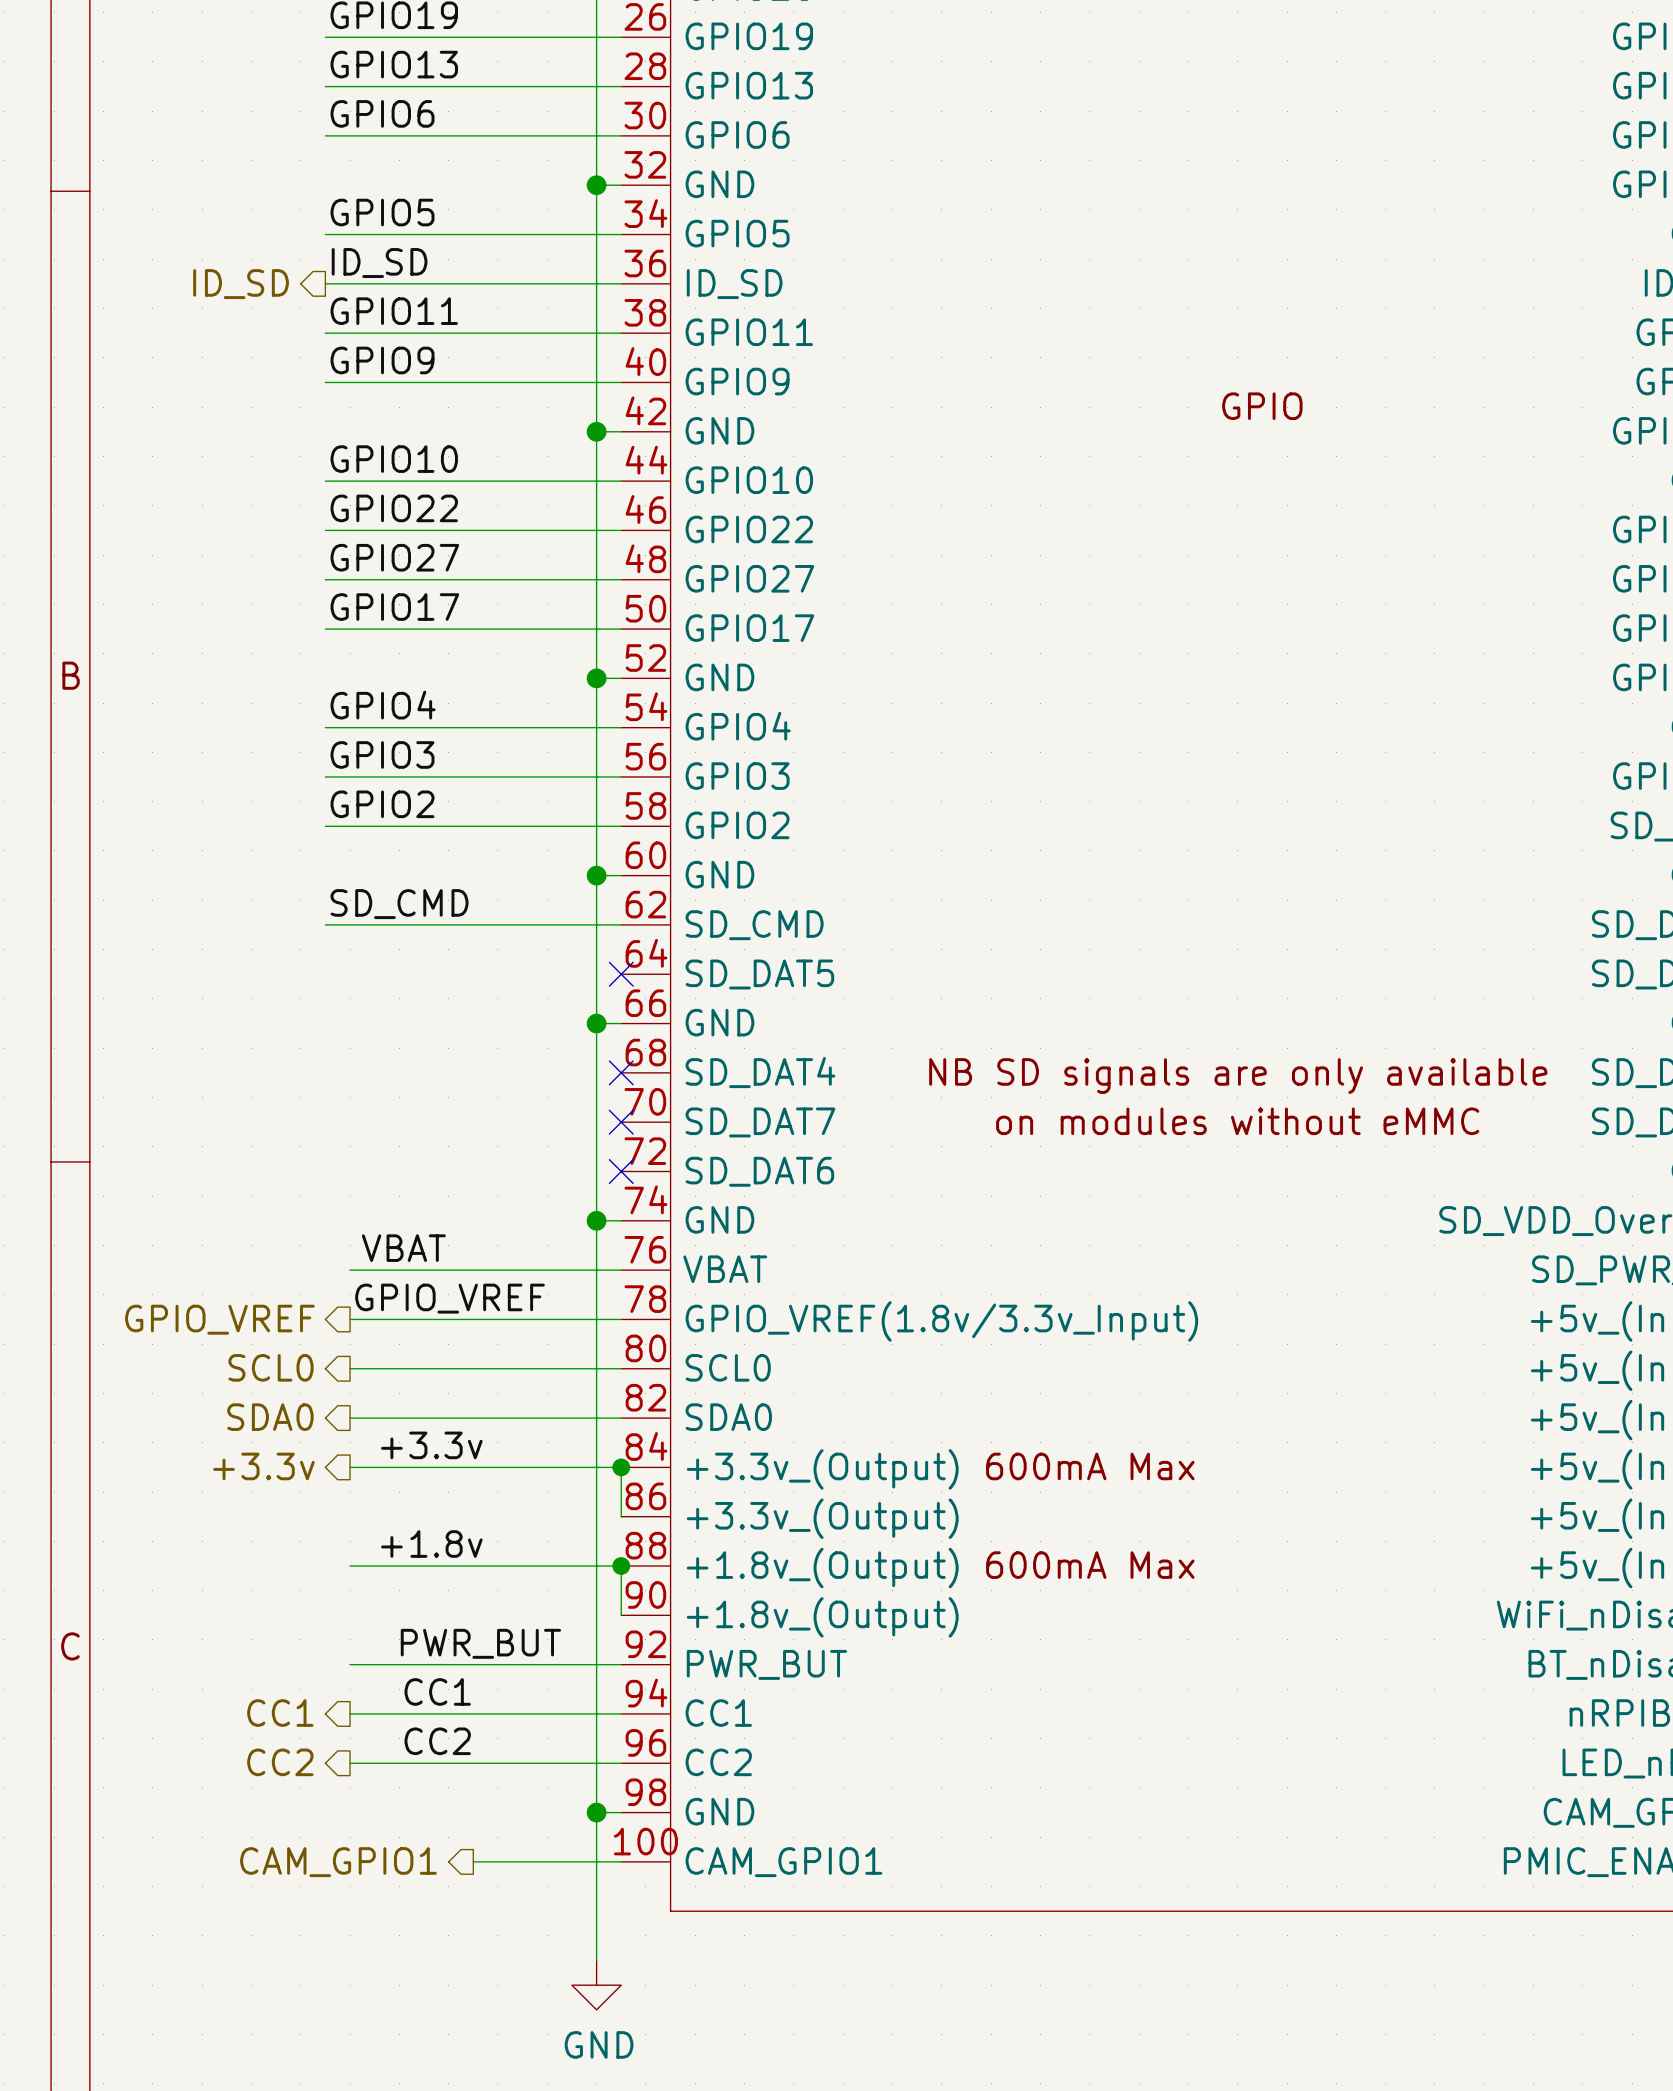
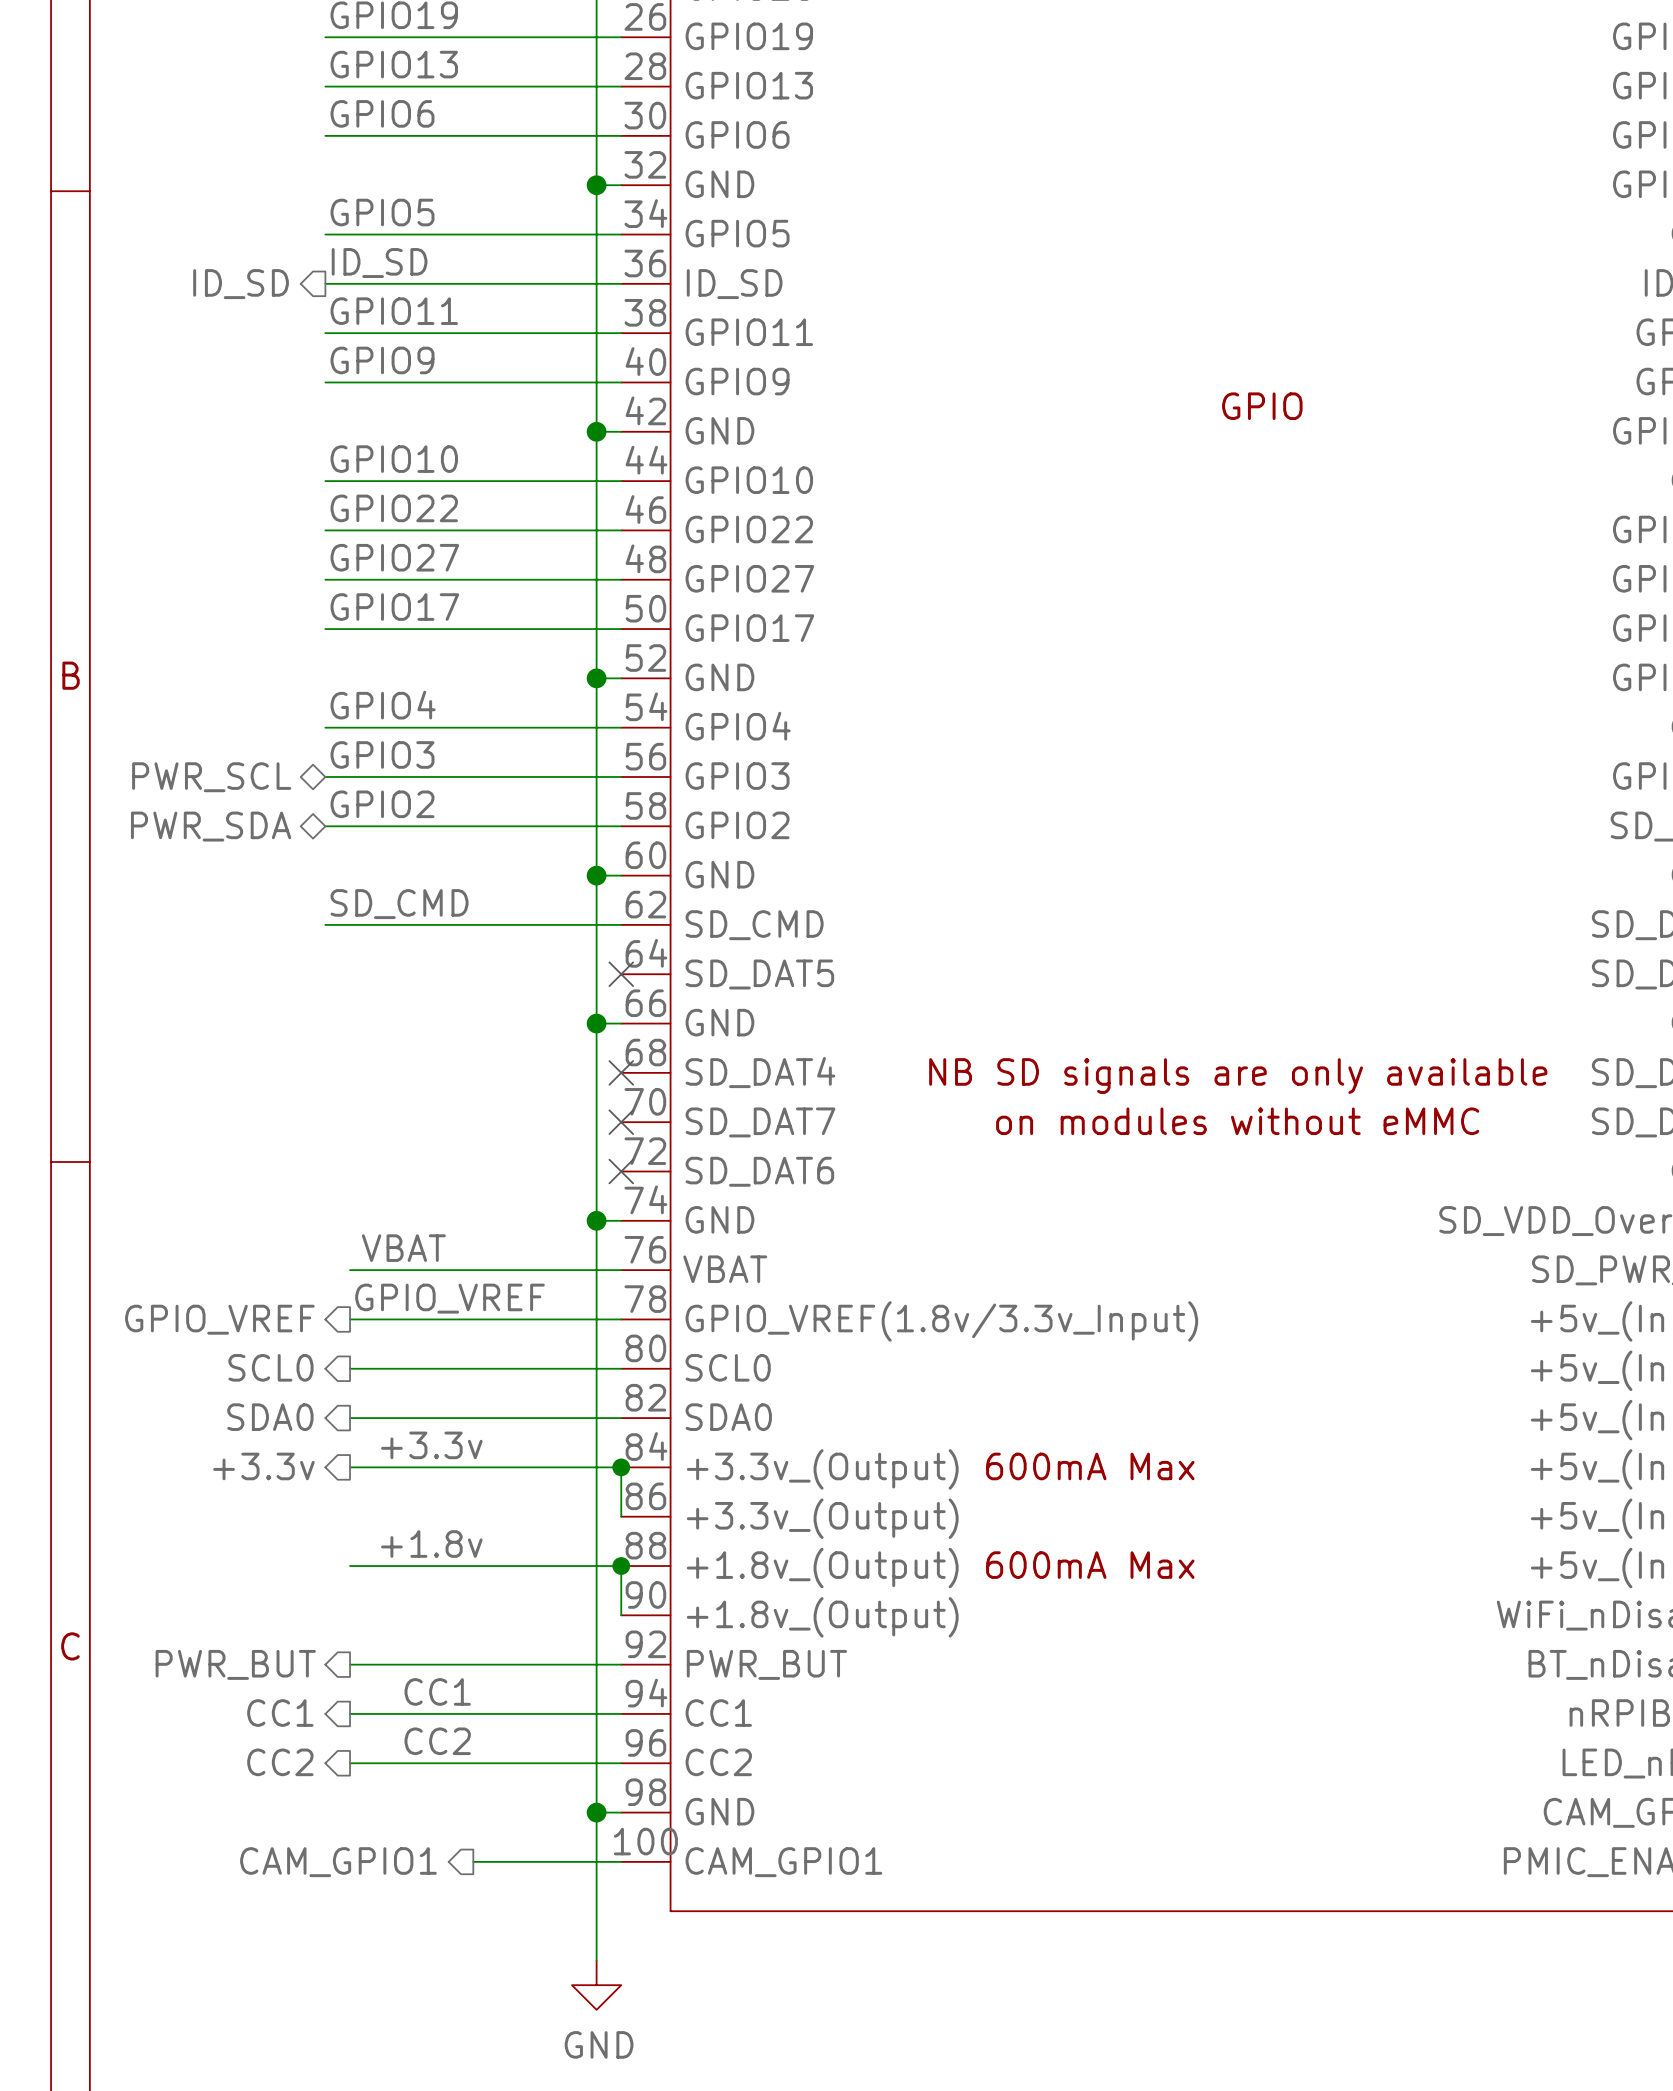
hierarchical label: none -> PWR_SCL (211, 777)
hierarchical label: none -> PWR_SDA (211, 826)
label: PWR_BUT (480, 1643) -> none
hierarchical label: none -> PWR_BUT (235, 1664)

